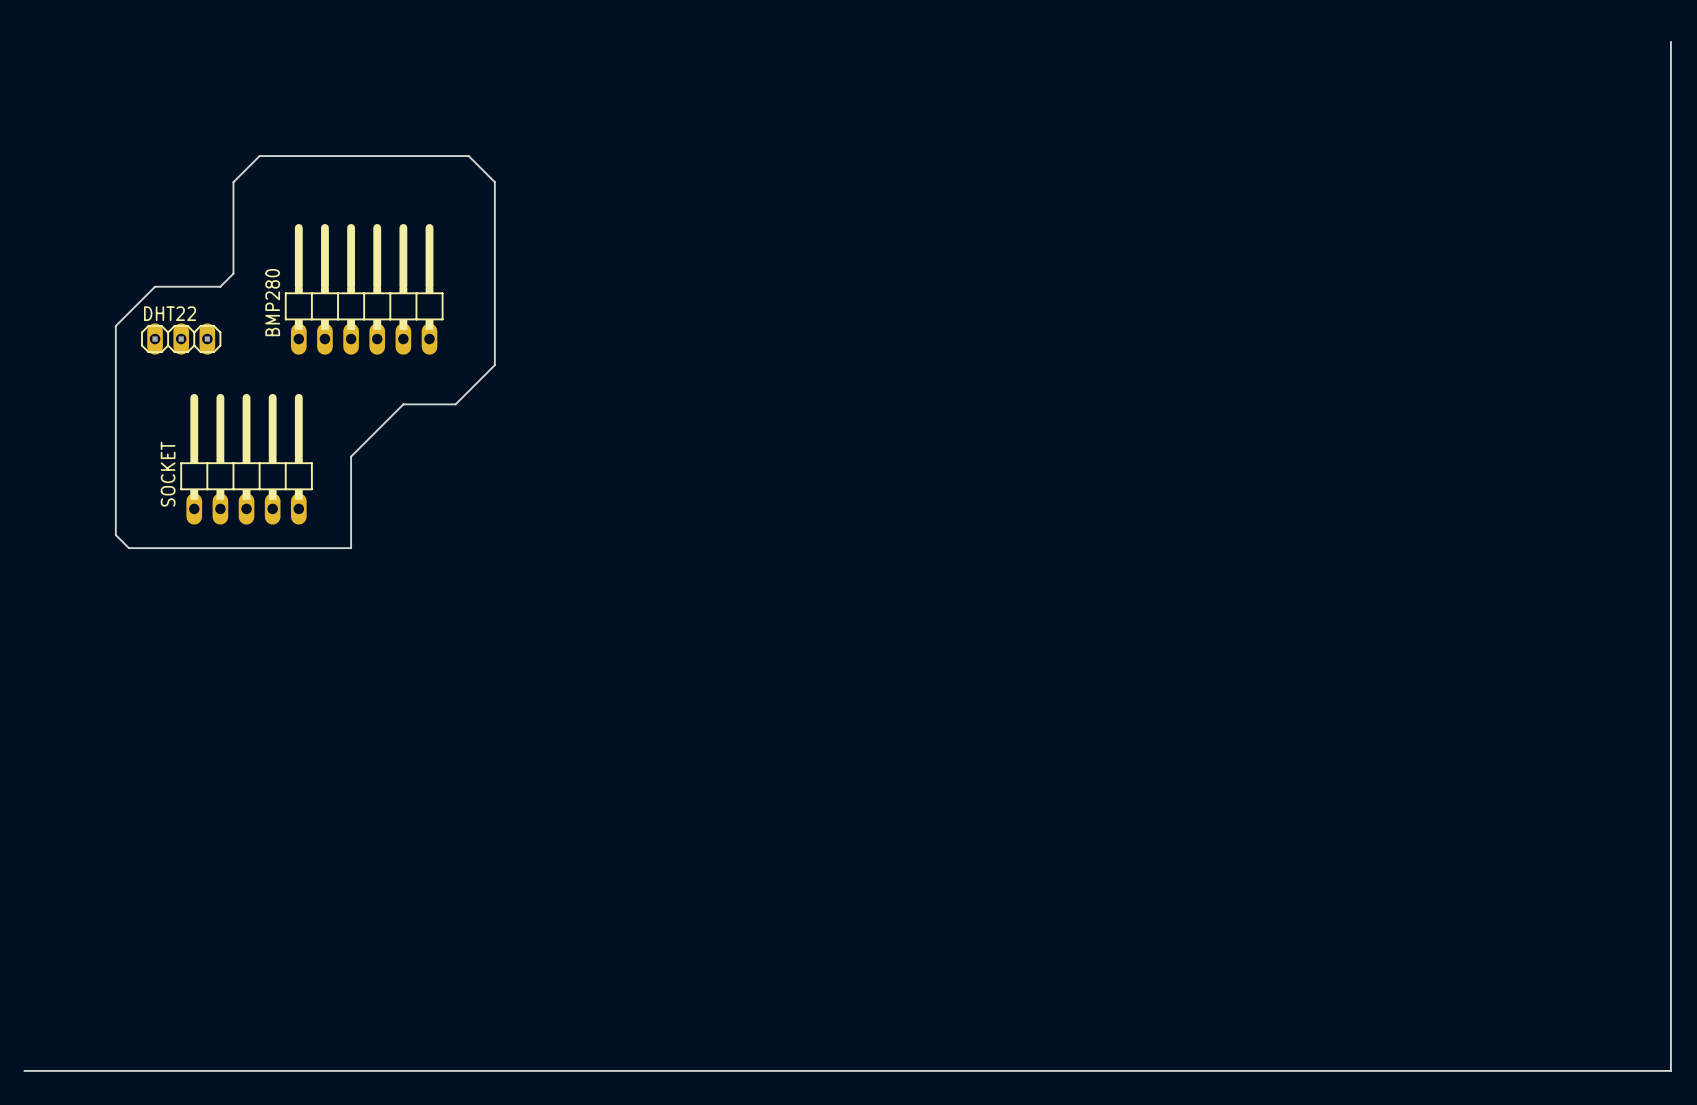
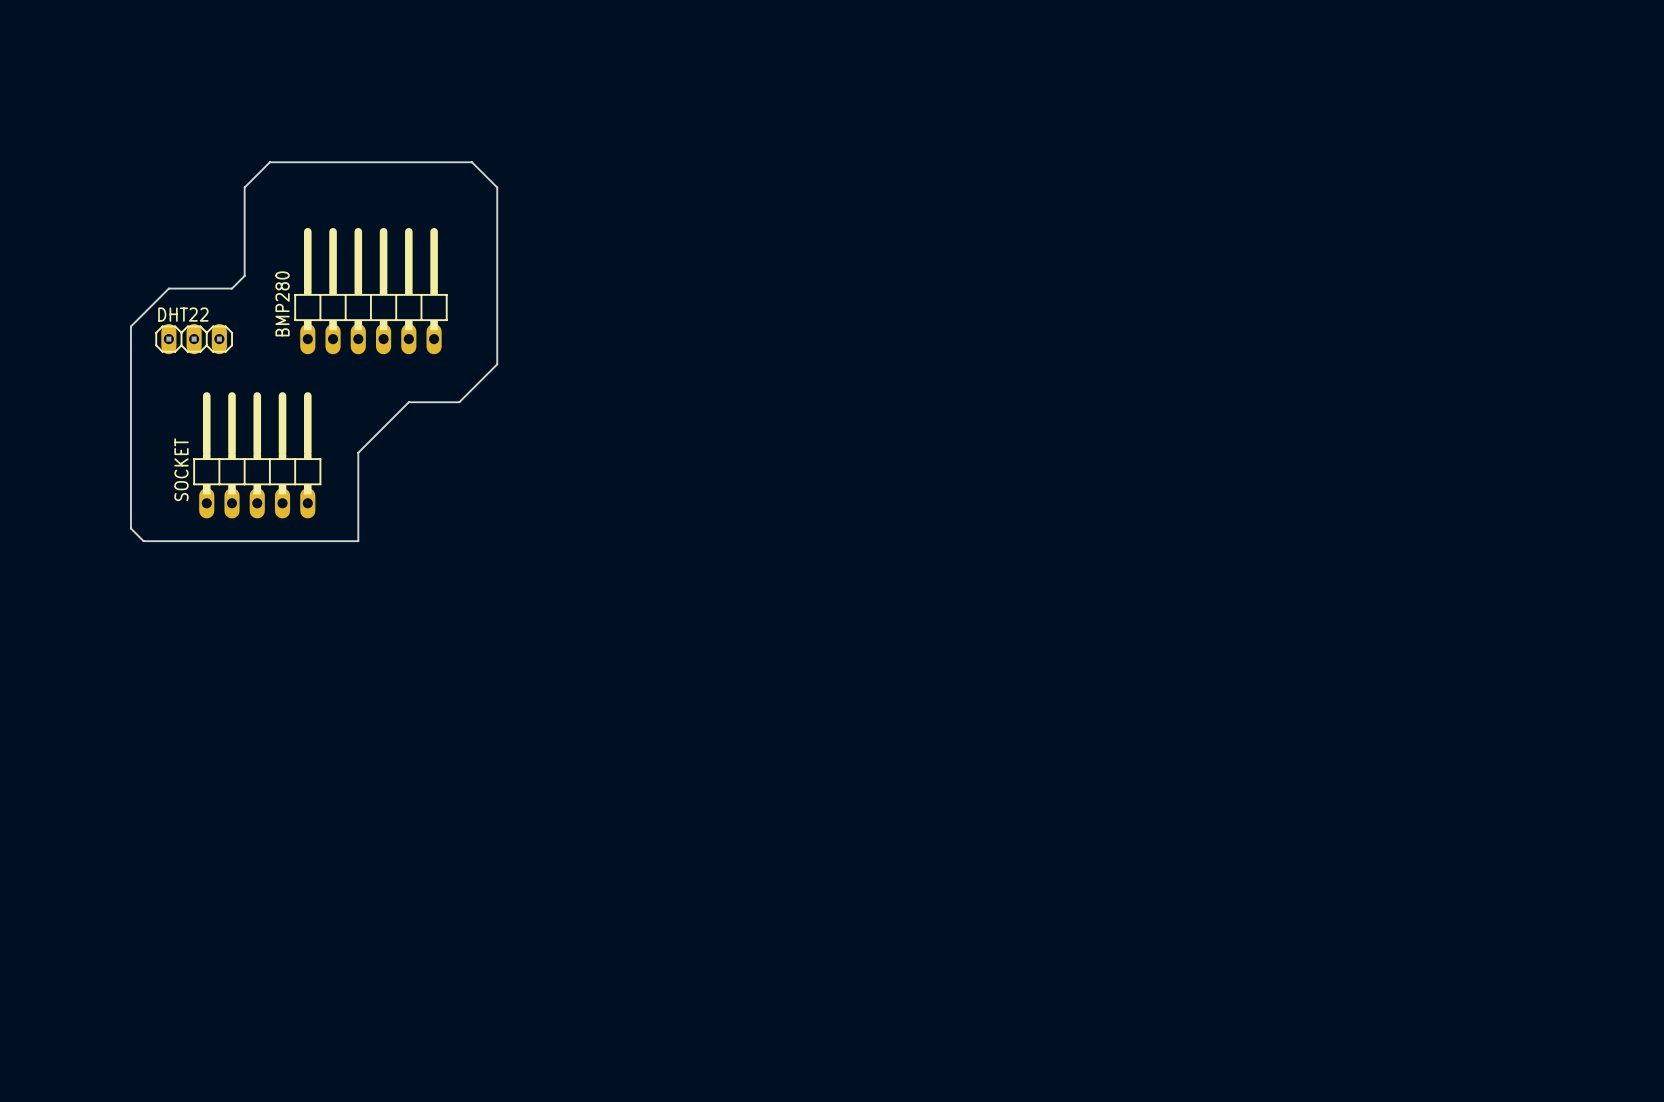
board edge: (1670, 41) (1670, 1070) (24, 1070) -> none

